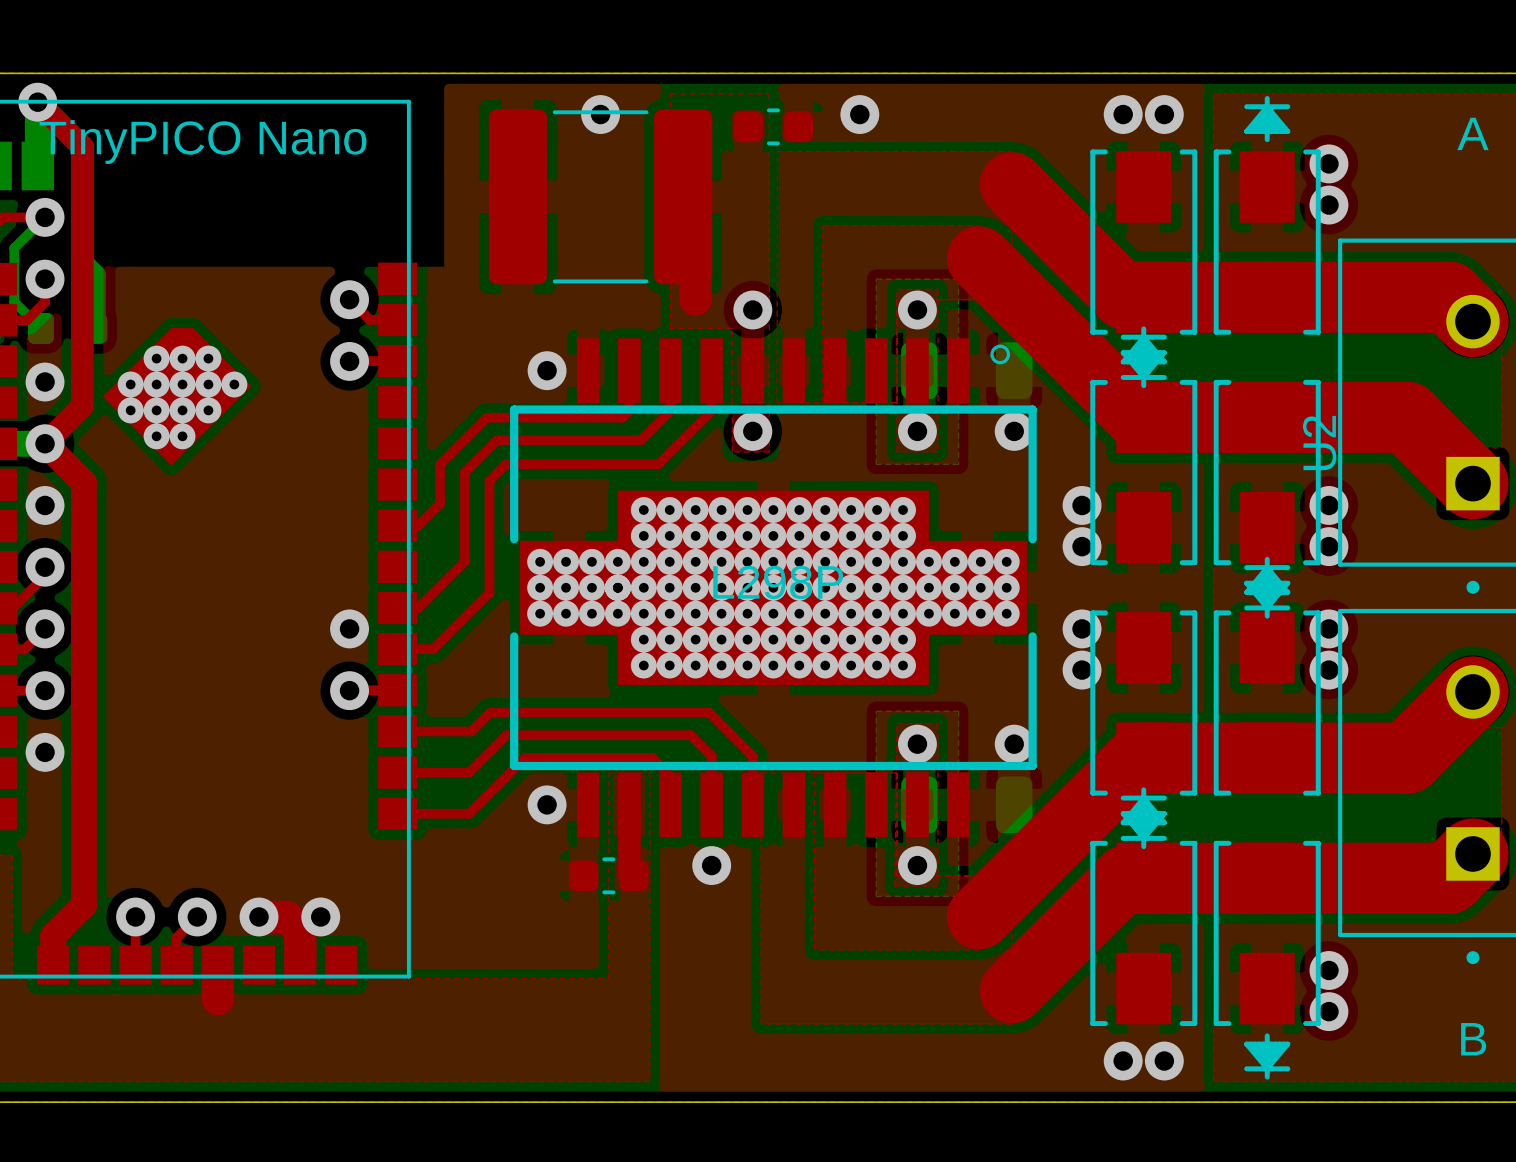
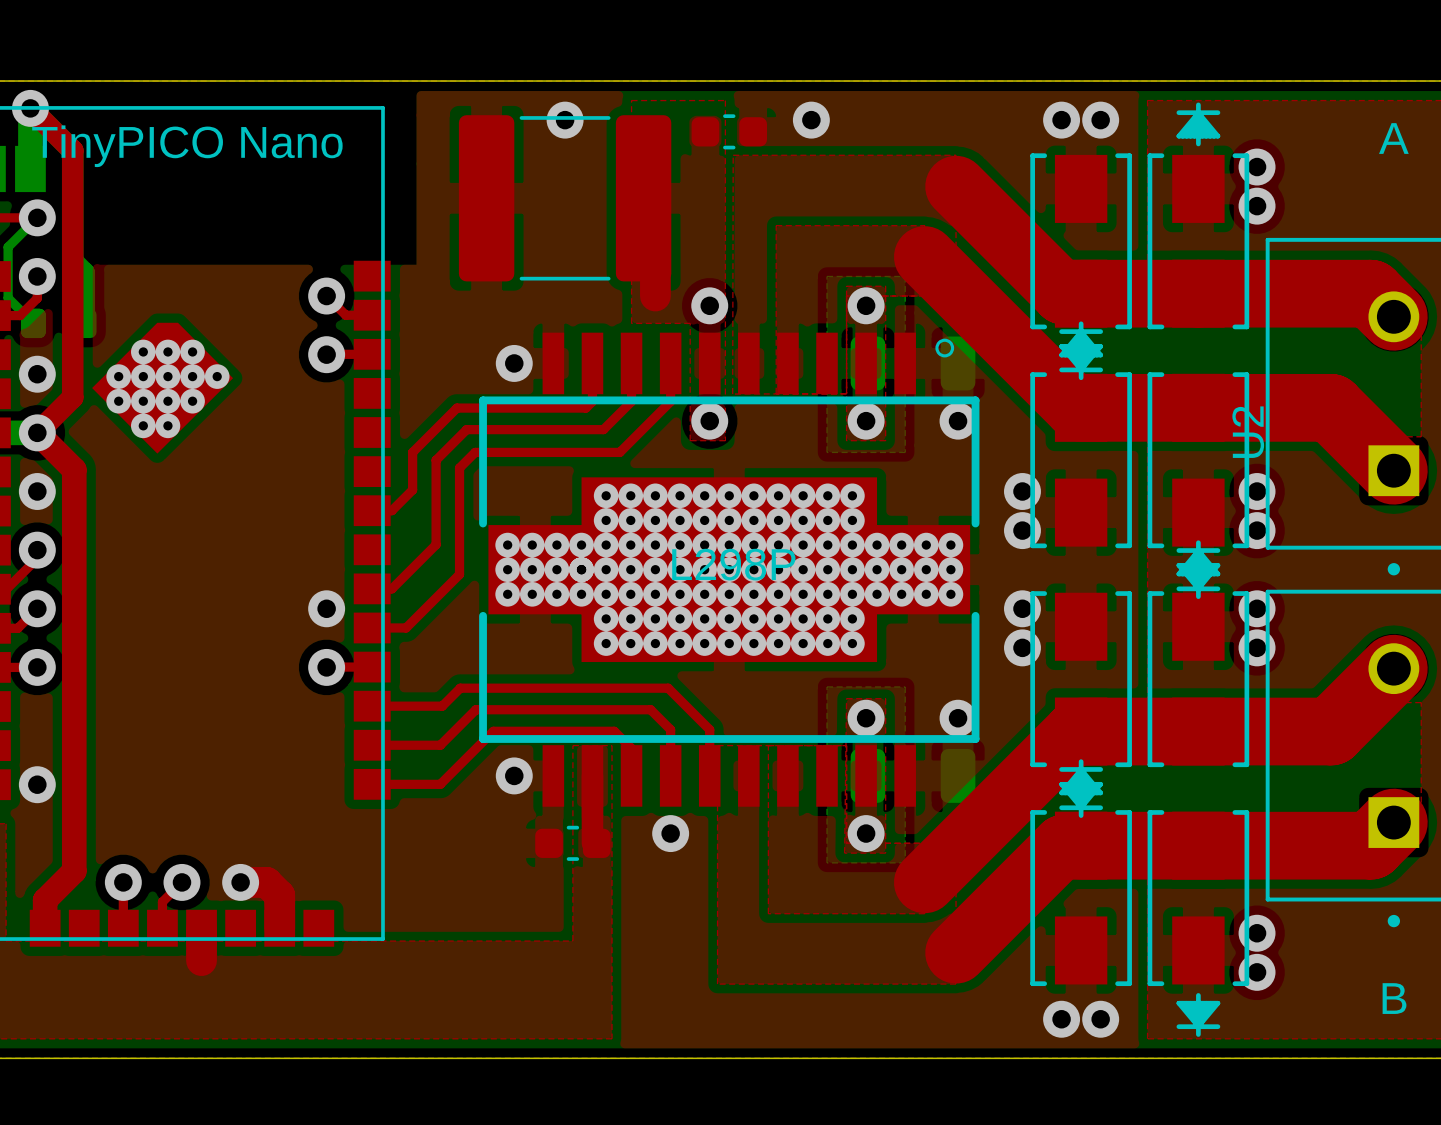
via position: (45, 752) -> (37, 784)
via: (320, 916) -> none

